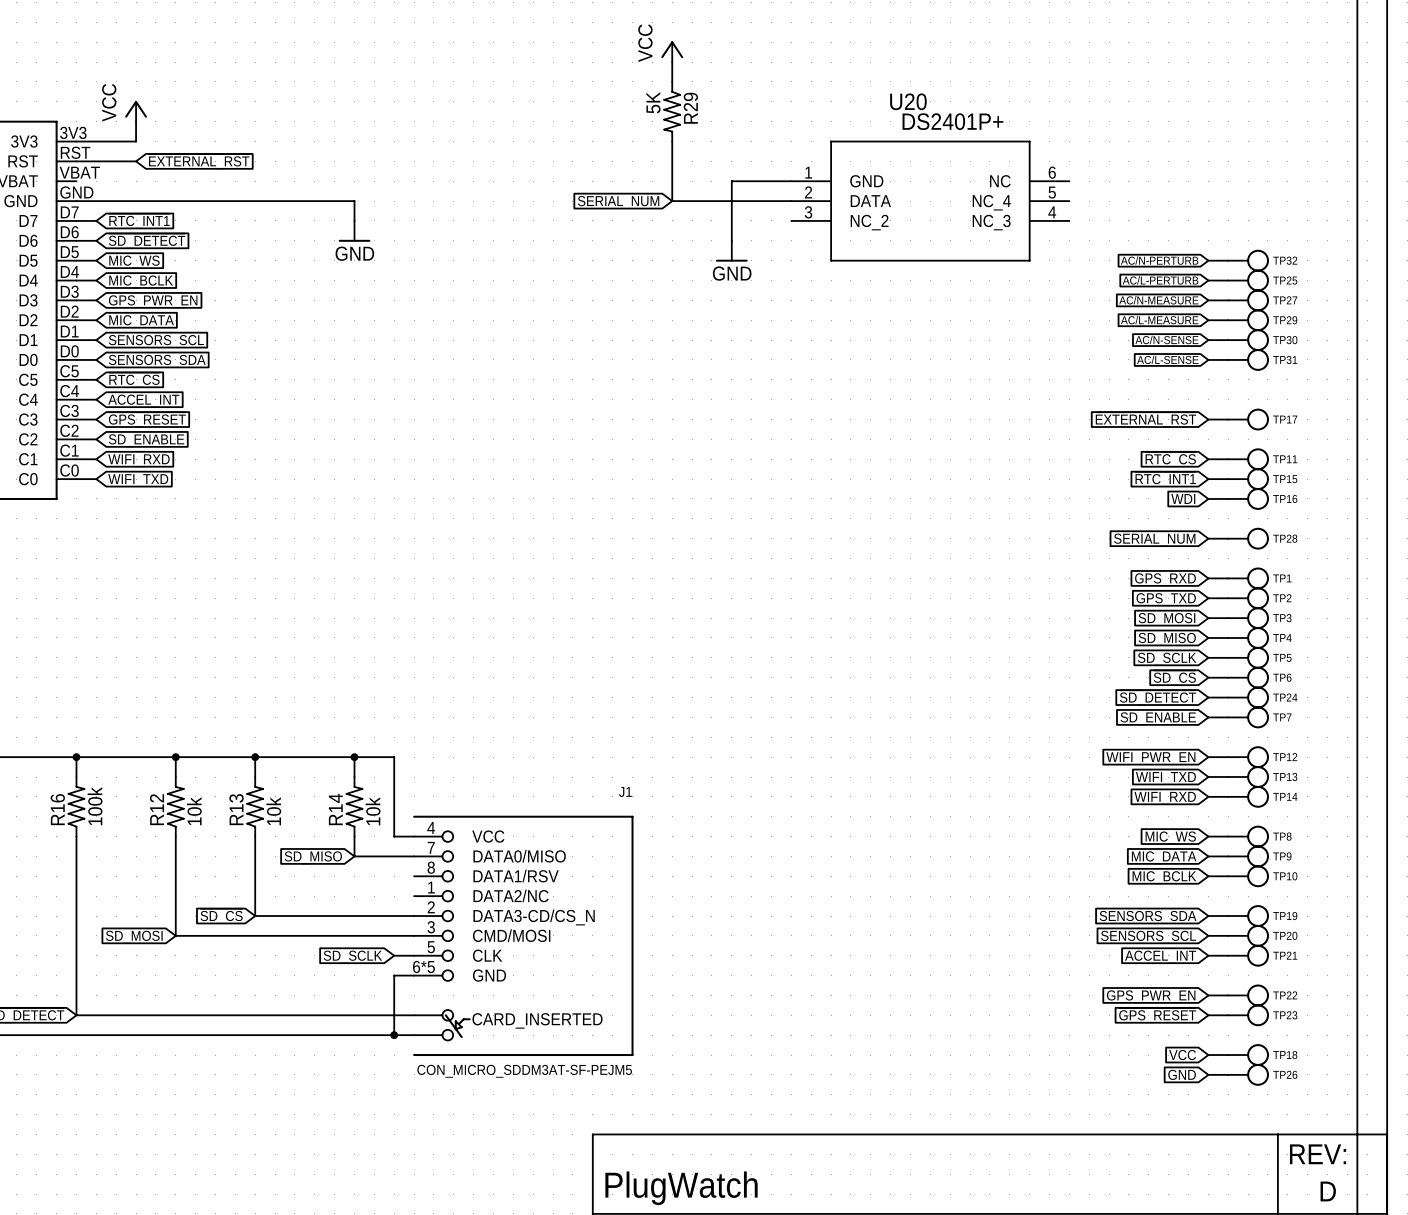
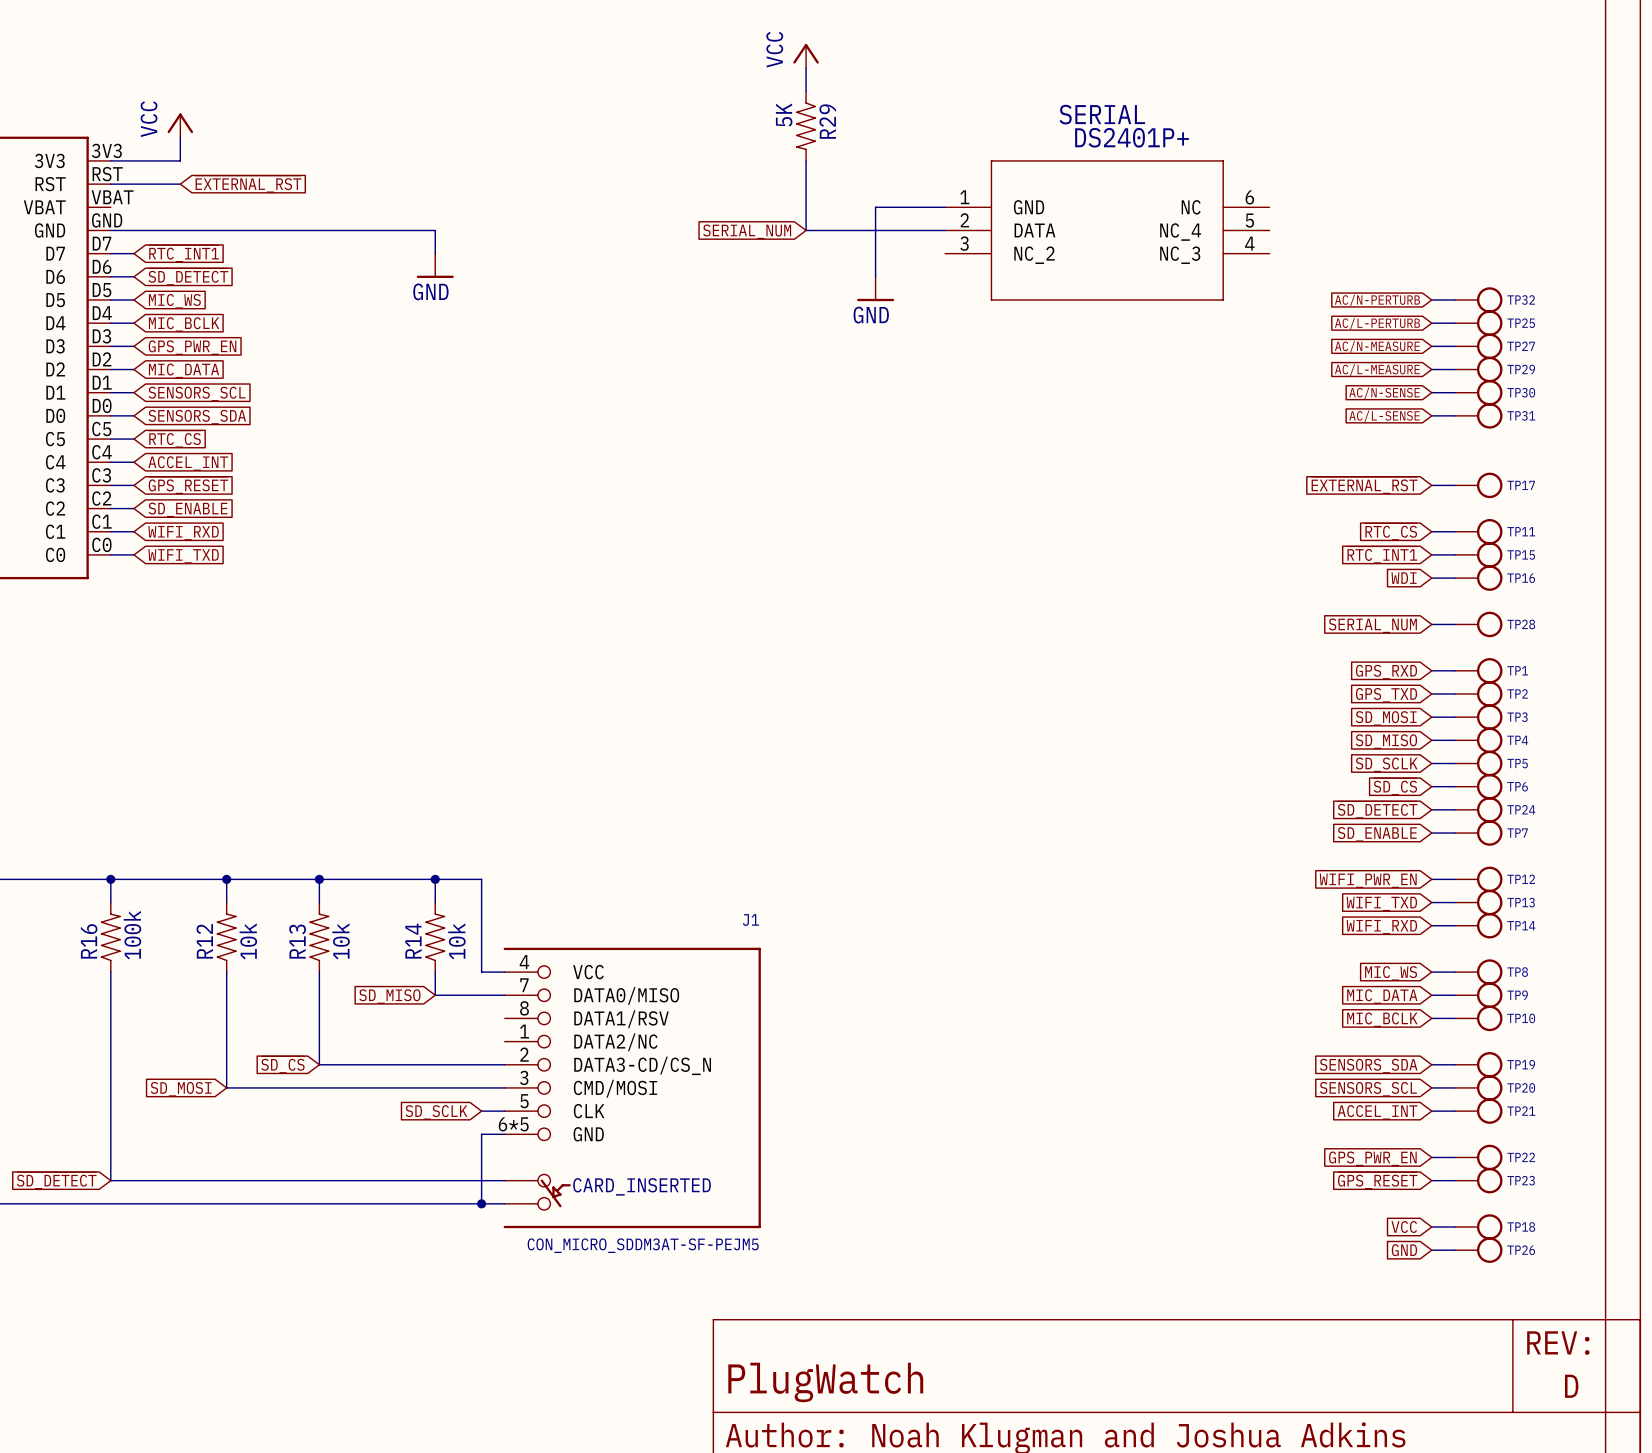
U20 name: U20 (908, 101) -> SERIAL (1102, 114)

